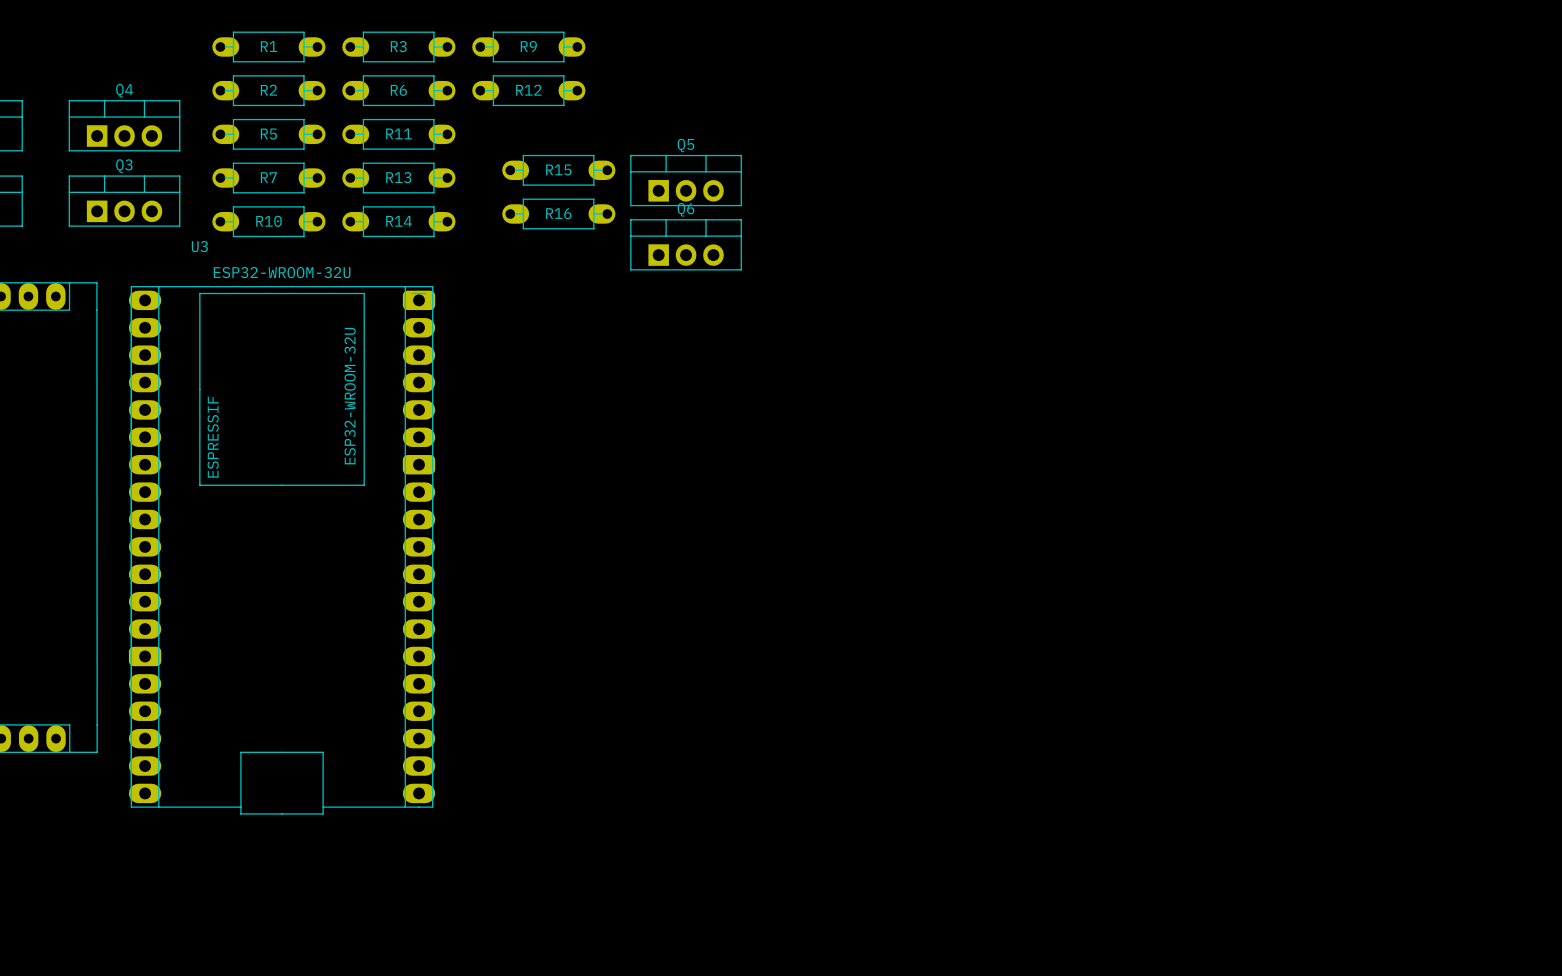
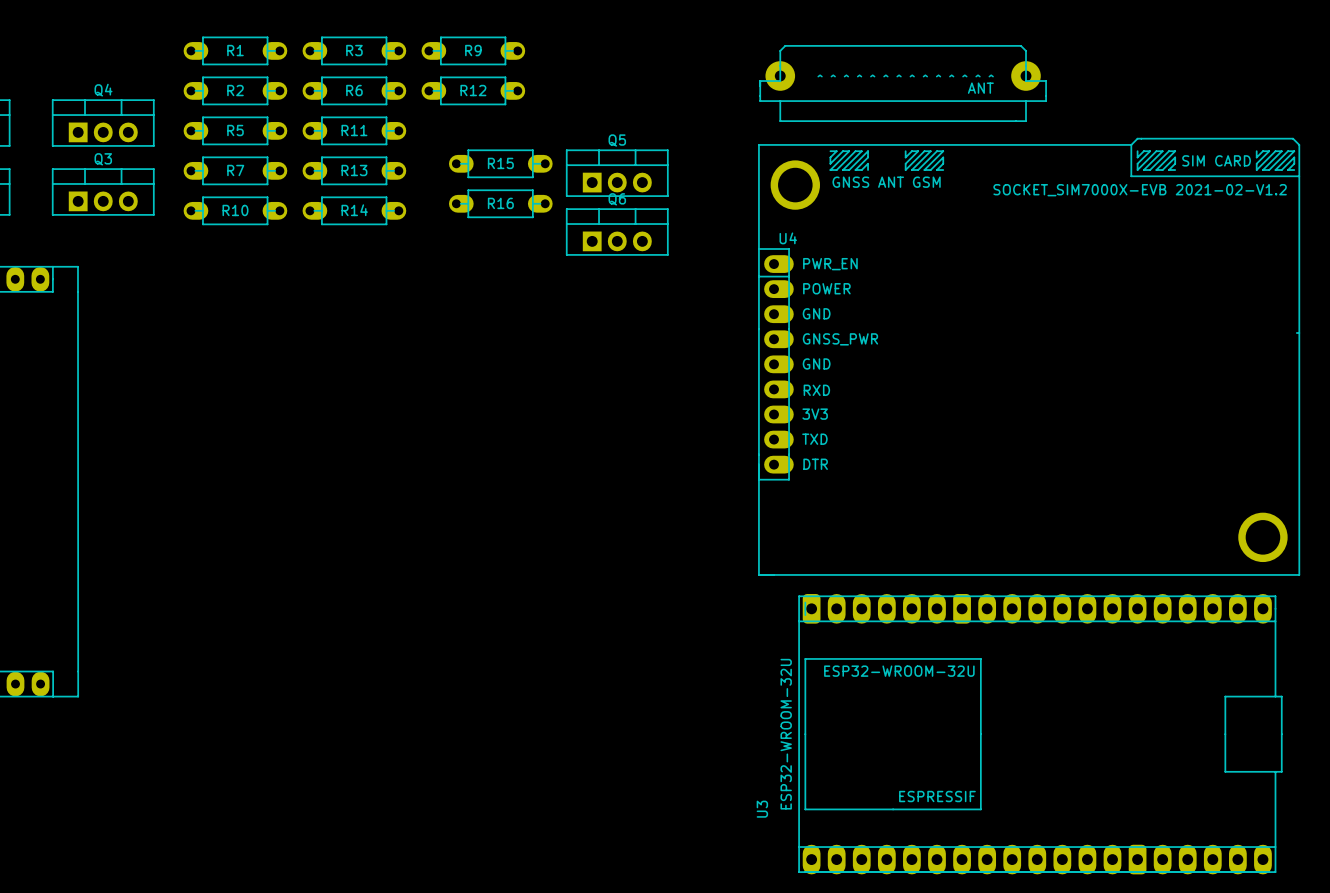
ANT: none -> (903, 83)
U4: none -> (1029, 356)
U3 rotation: 0° (282, 550) -> 90° counterclockwise (1040, 734)
U3 position: (282, 550) -> (1040, 734)

